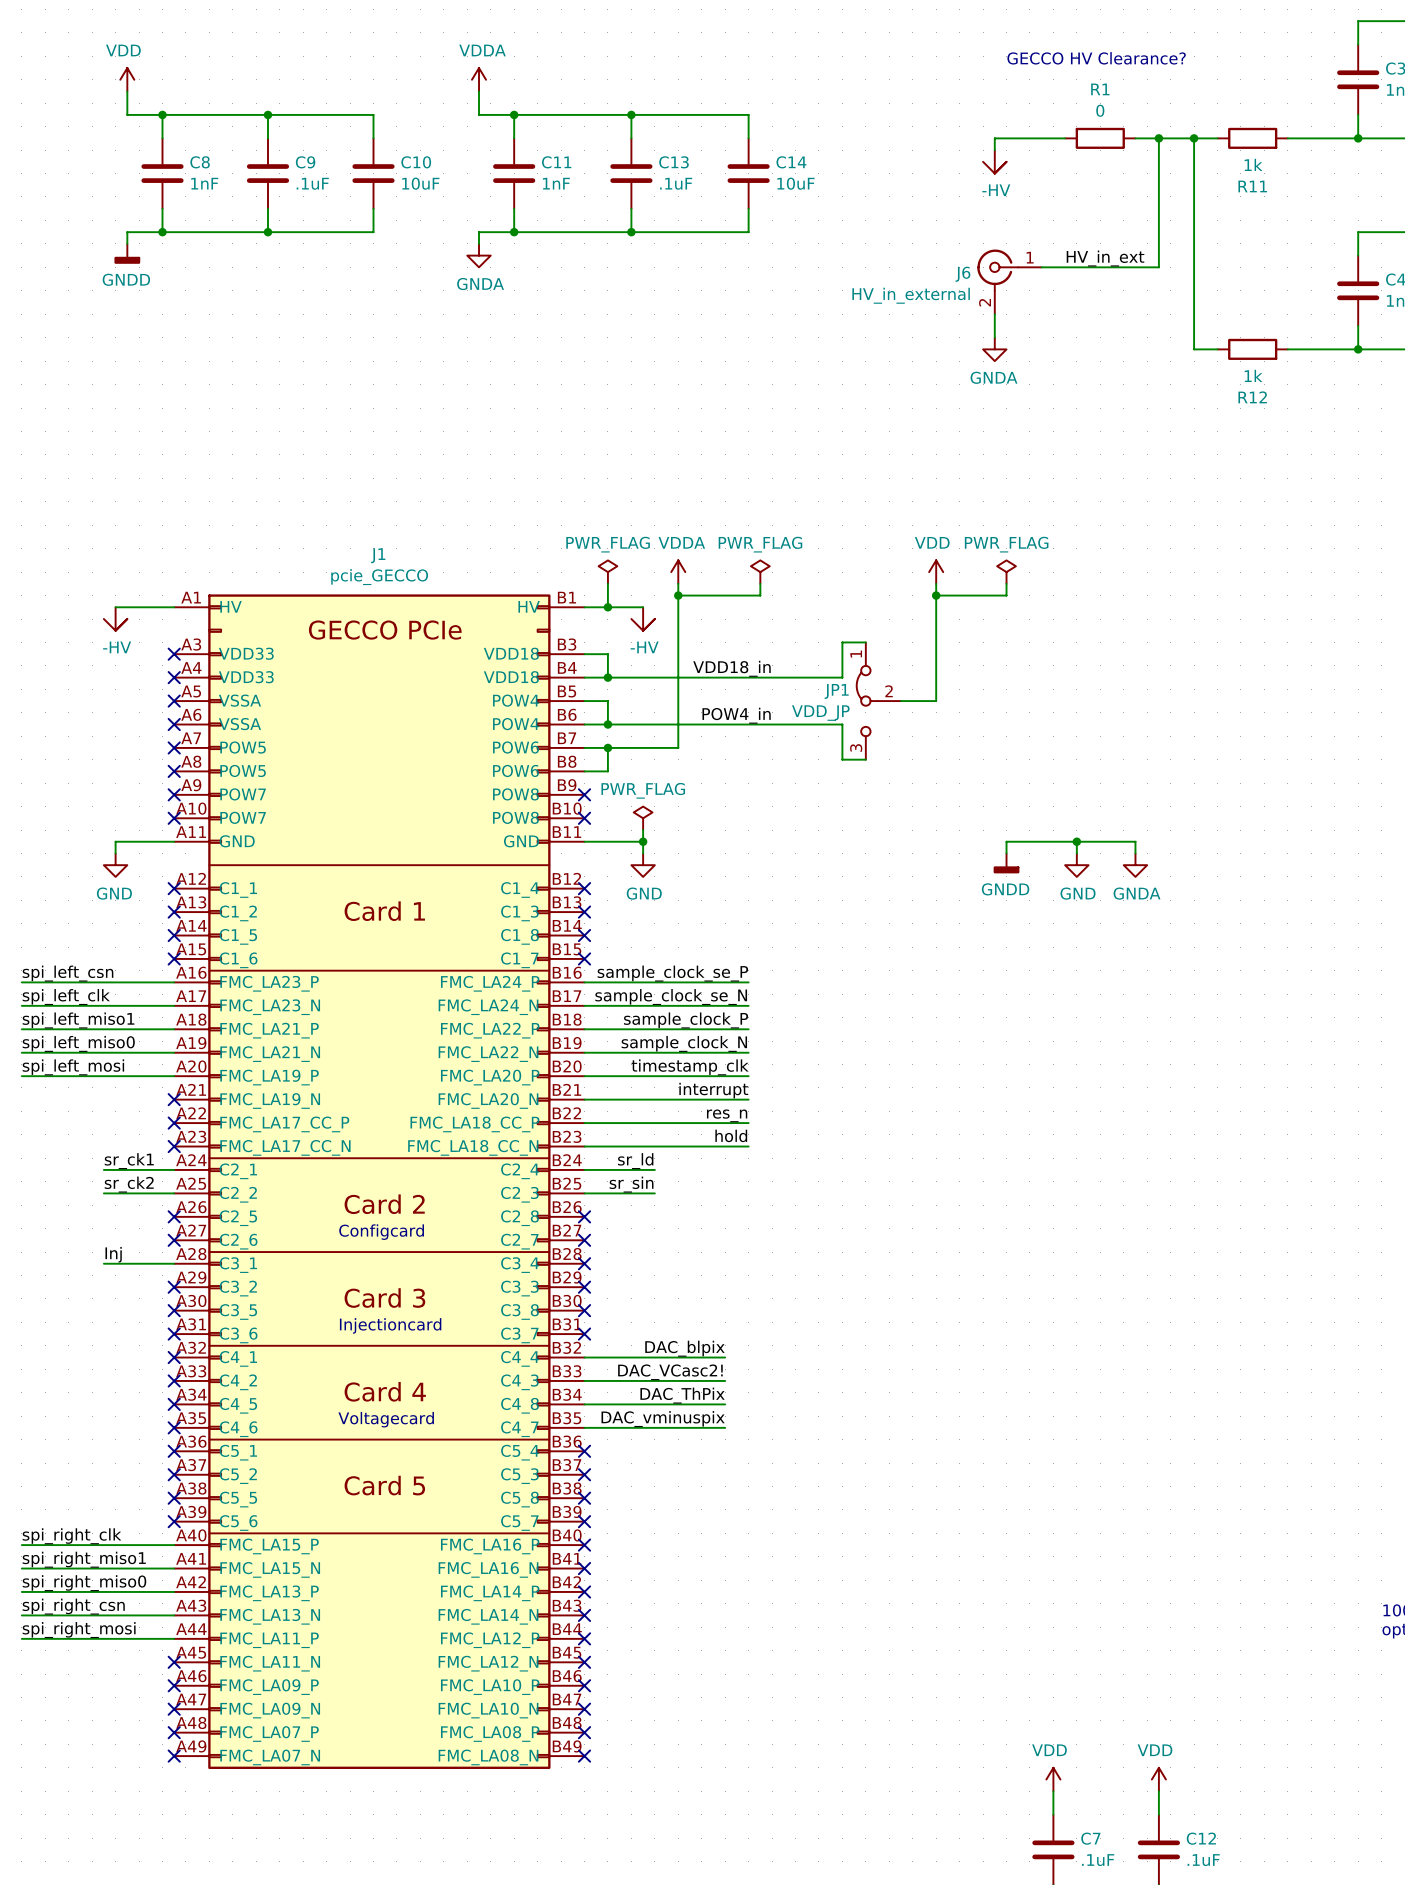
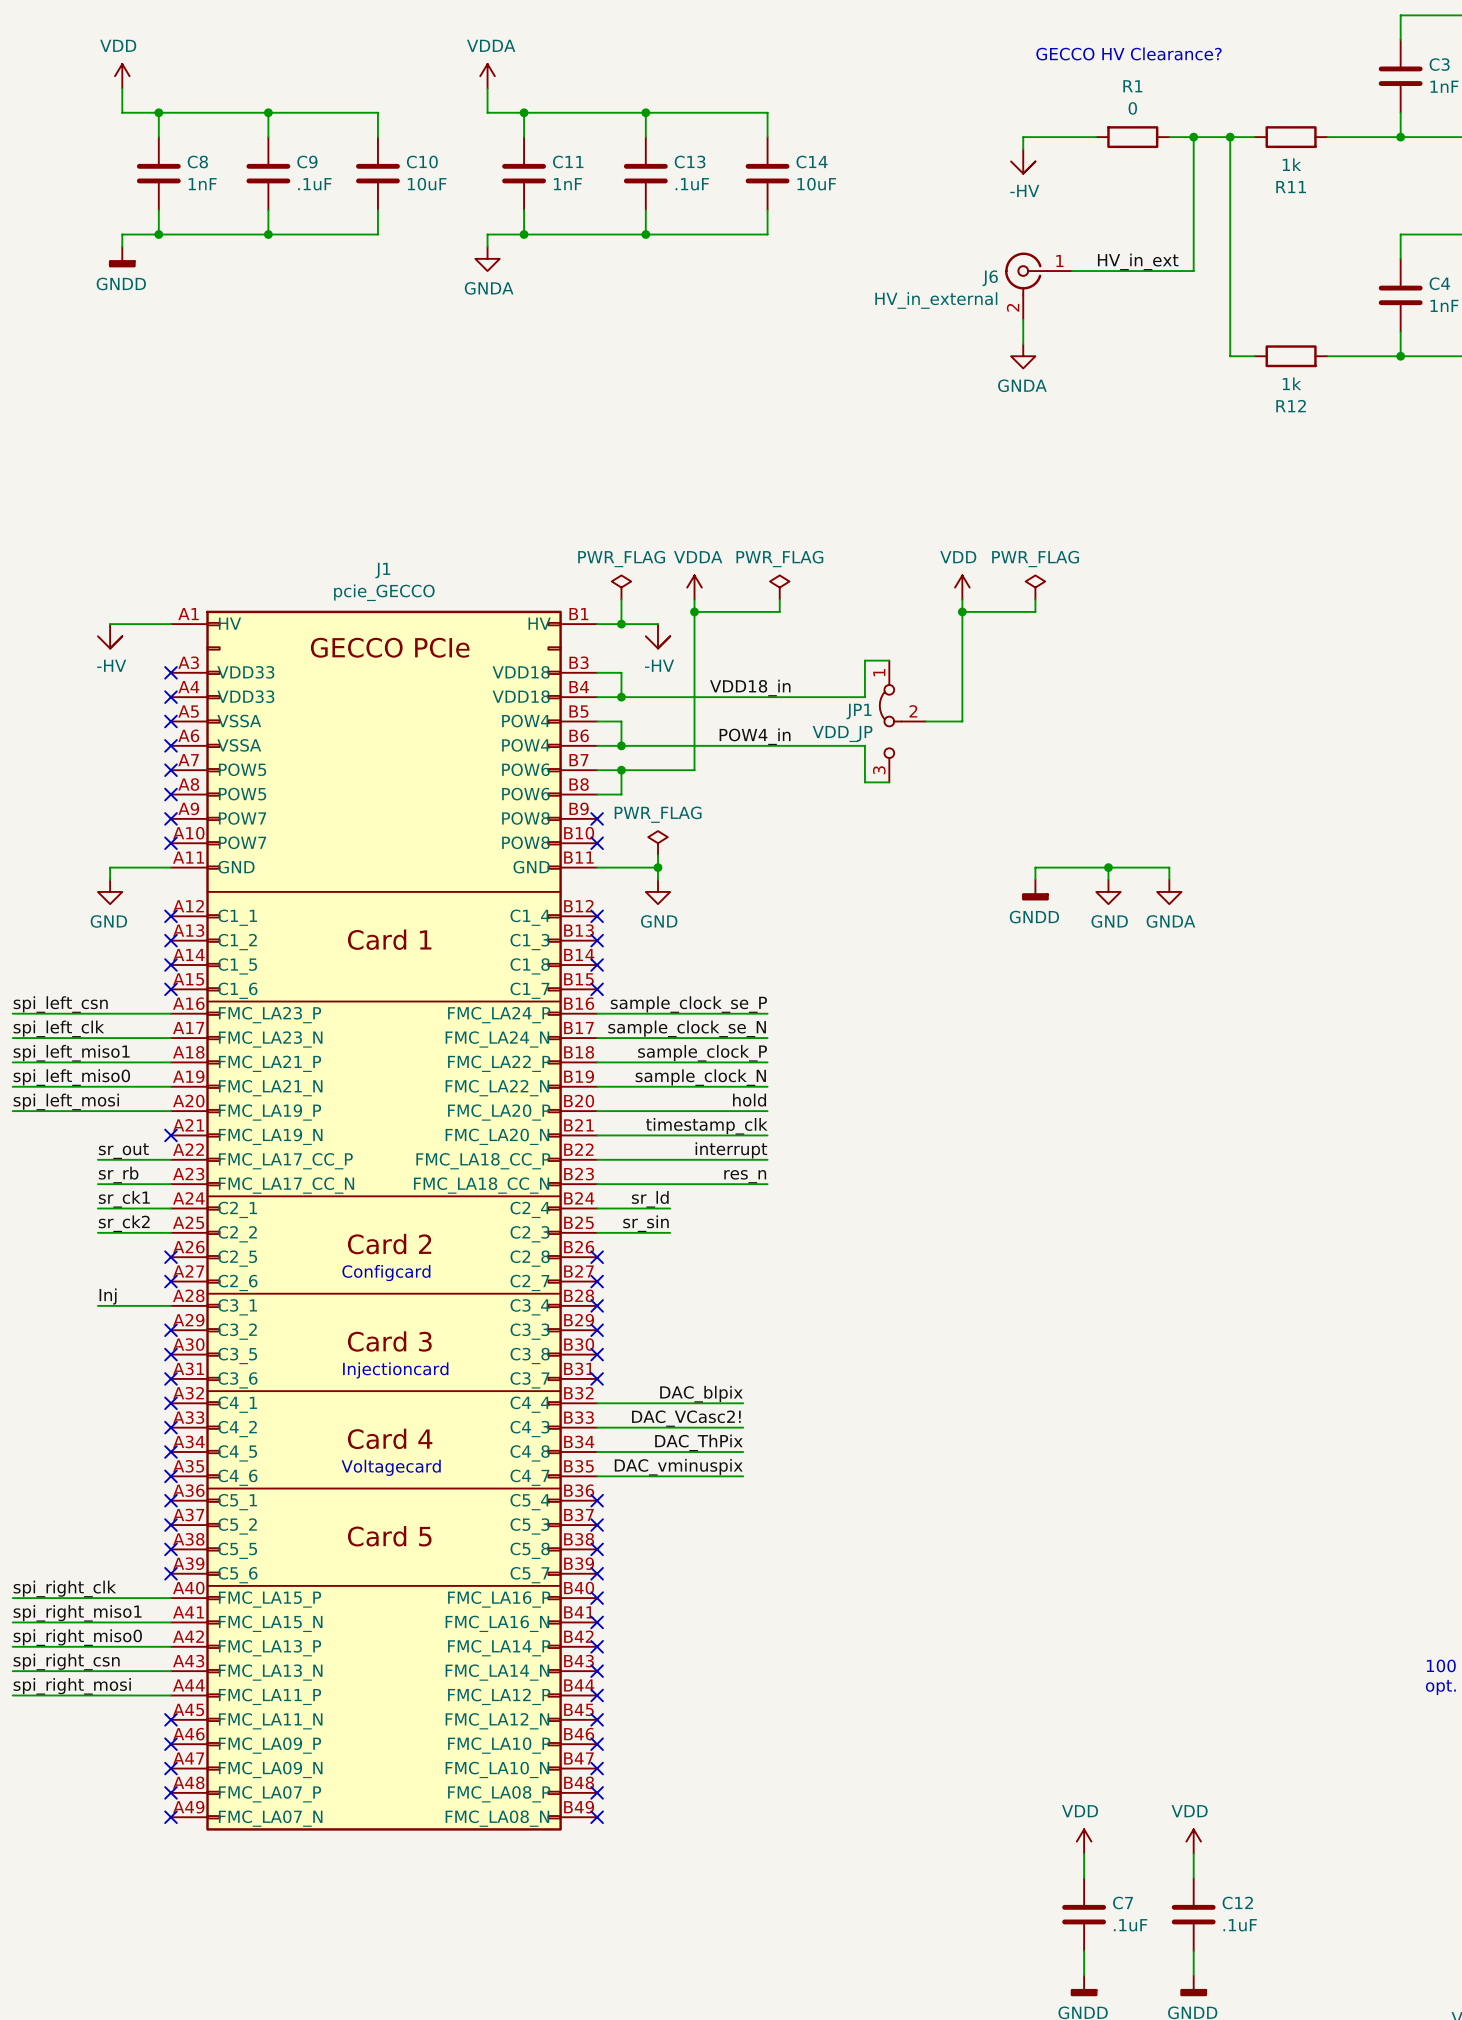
label: timestamp_clk (690, 1067) -> hold (749, 1100)
label: interrupt (713, 1090) -> timestamp_clk (706, 1126)
label: none -> sr_out (123, 1151)
label: res_n (727, 1115) -> interrupt (731, 1150)
wire: none -> (97, 1159) (170, 1159)
no-connect mark: (174, 1123) -> none
label: hold (731, 1135) -> res_n (745, 1176)
label: none -> sr_rb (118, 1175)
wire: none -> (97, 1184) (170, 1184)
no-connect mark: (174, 1146) -> none

